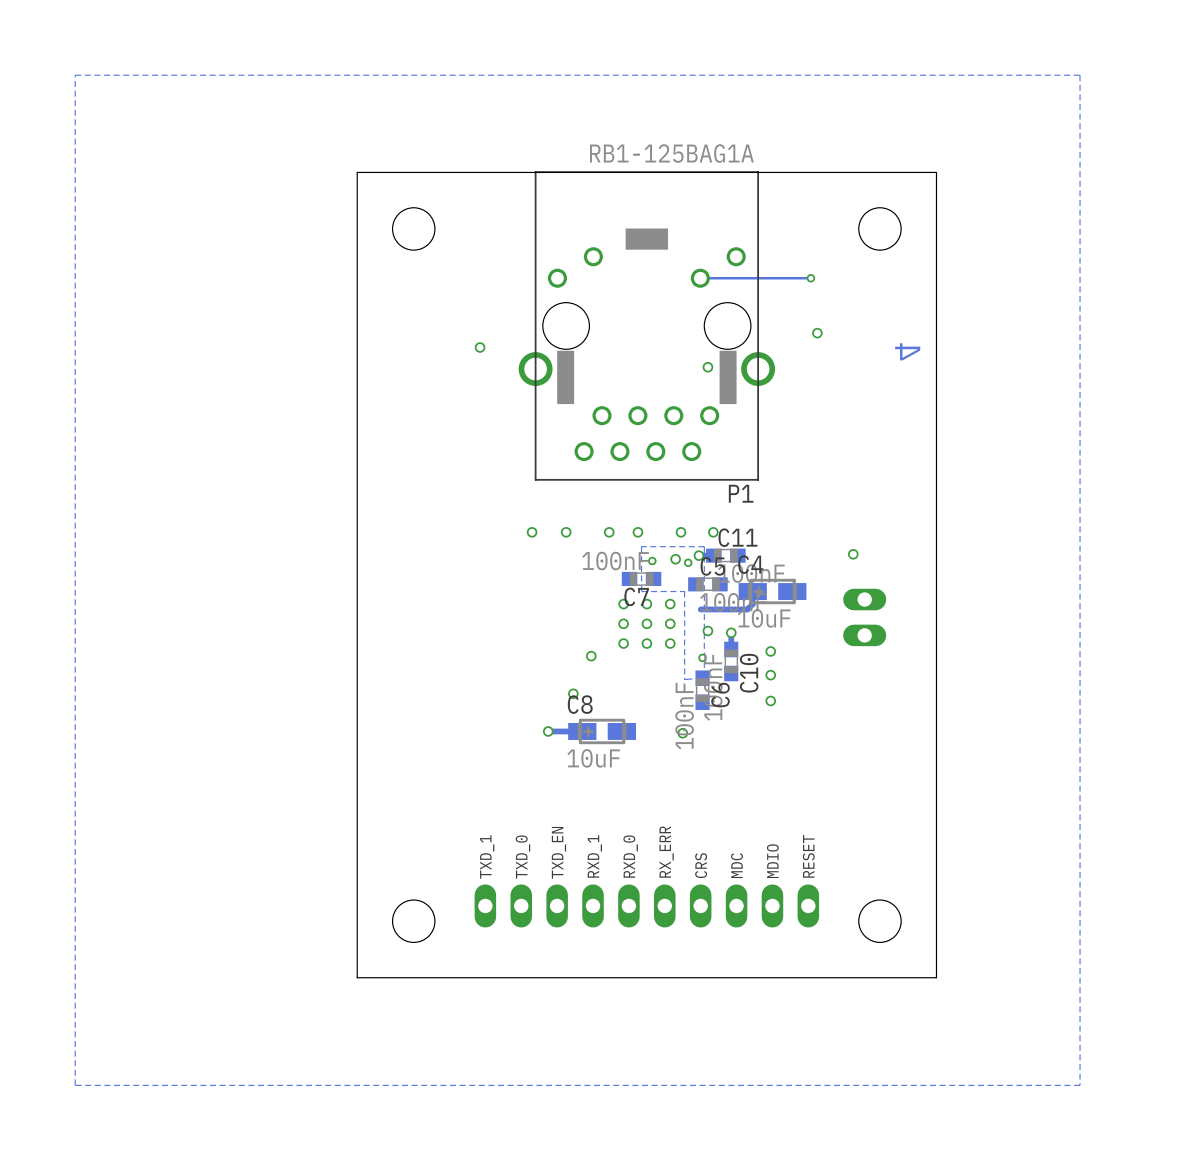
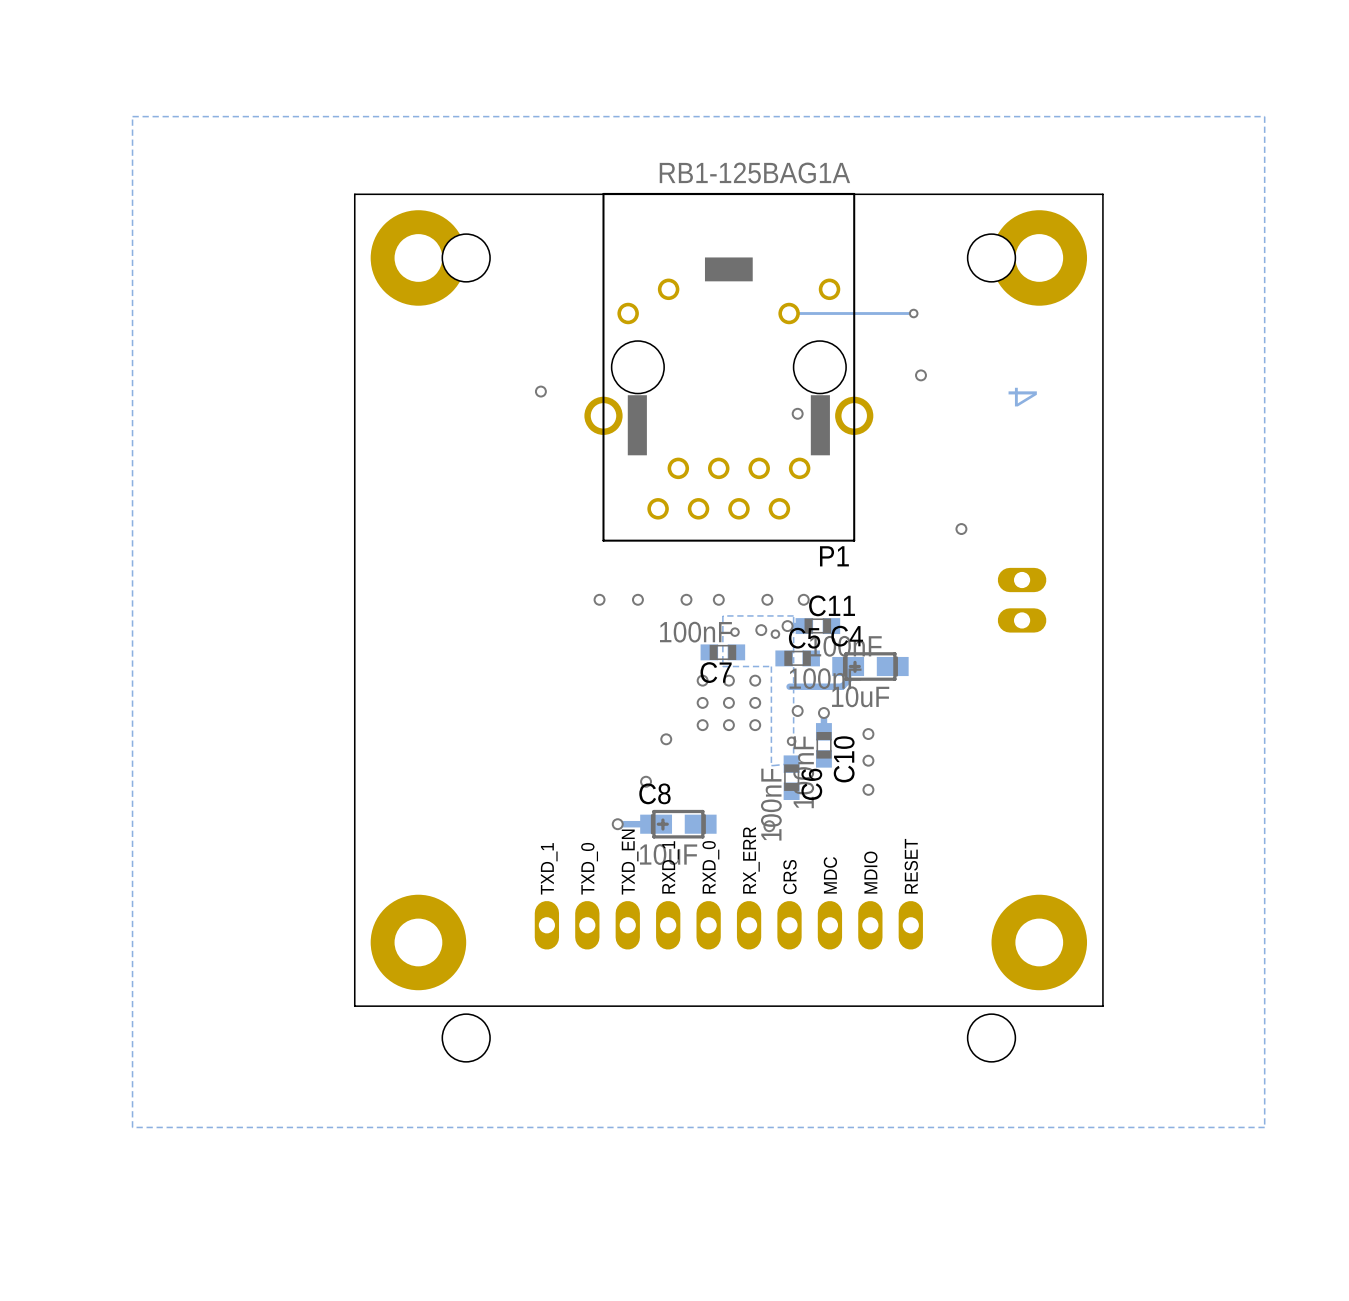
zone outline: (1080, 75) (75, 75) (75, 1085) (1080, 1085) (1080, 75) -> (1264, 116) (1264, 1127) (132, 1127) (132, 116) (1264, 116)
board edge: (936, 172) (936, 977) (357, 977) (357, 172) -> (1055, 194) (1102, 194) (1102, 1006) (354, 1006) (354, 194) (402, 194)
part: none -> (418, 257)
part: none -> (1039, 257)
via position: (853, 554) -> (961, 529)
part position: (864, 617) -> (1022, 600)
part: none -> (418, 942)
part: none -> (1039, 942)
text position: TXD_EN (558, 852) -> TXD_EN (630, 862)
text position: RX_ERR (666, 852) -> RX_ERR (751, 860)
text position: RXD_1 (594, 856) -> RXD_1 (670, 867)
text position: RXD_0 (630, 856) -> RXD_0 (710, 867)
text position: RESET (808, 856) -> RESET (911, 866)
text position: TXD_1 (487, 857) -> TXD_1 (549, 868)
text position: TXD_0 (522, 857) -> TXD_0 (589, 868)
text position: MDIO (772, 861) -> MDIO (870, 872)
text position: CRS (701, 865) -> CRS (789, 877)
text position: MDC (736, 865) -> MDC (830, 875)
part position: (646, 905) -> (728, 925)

